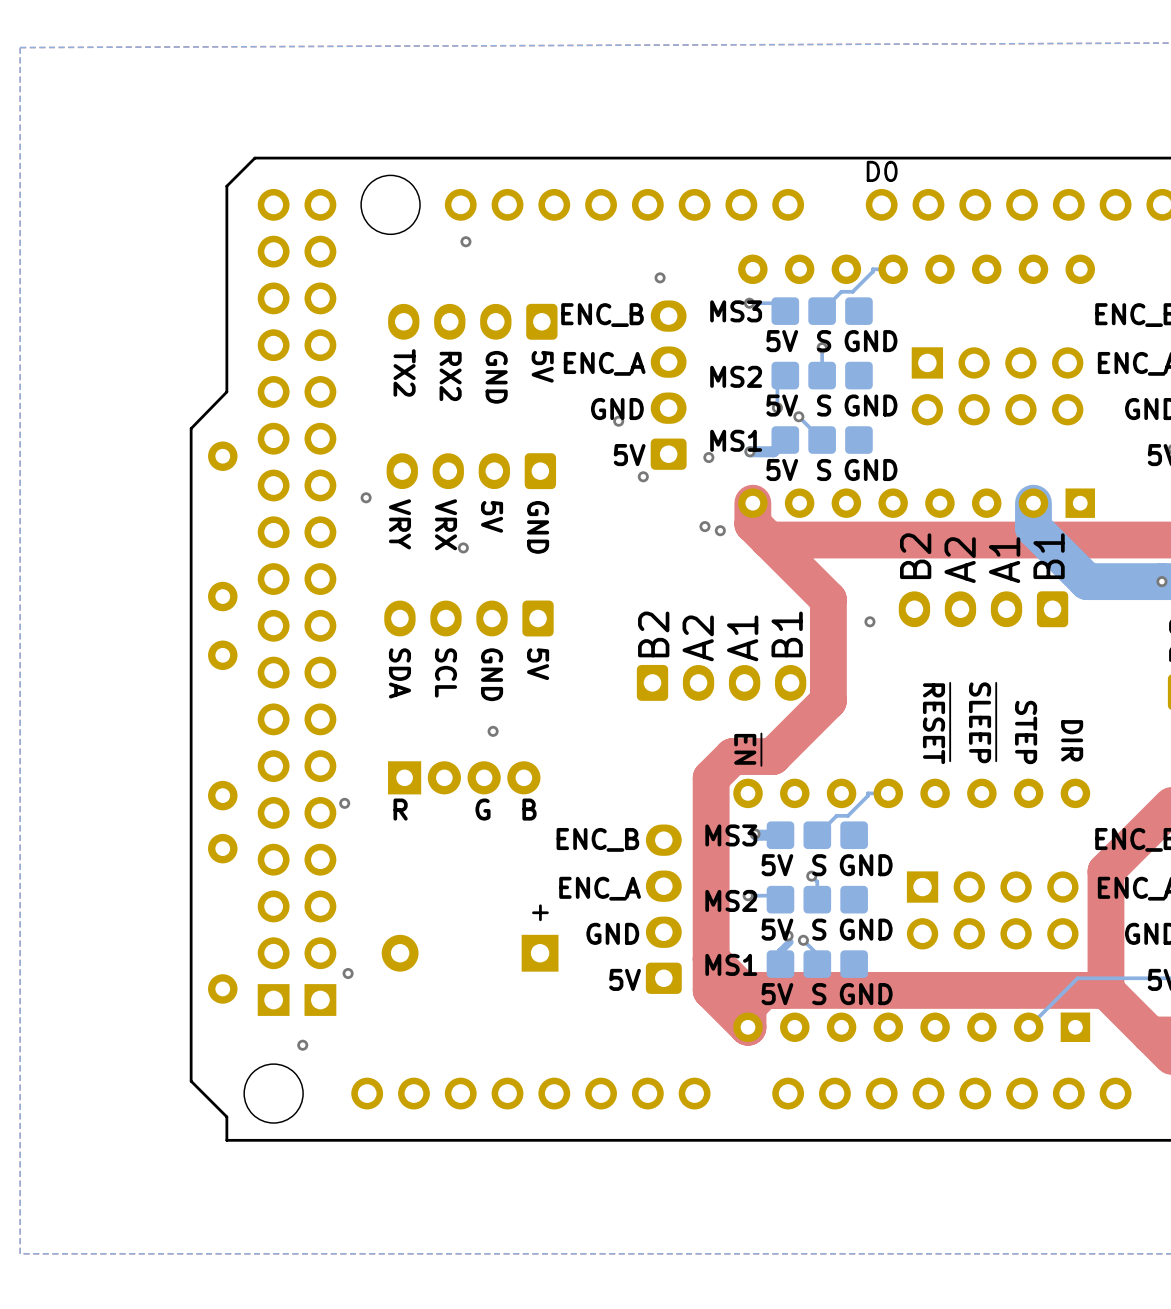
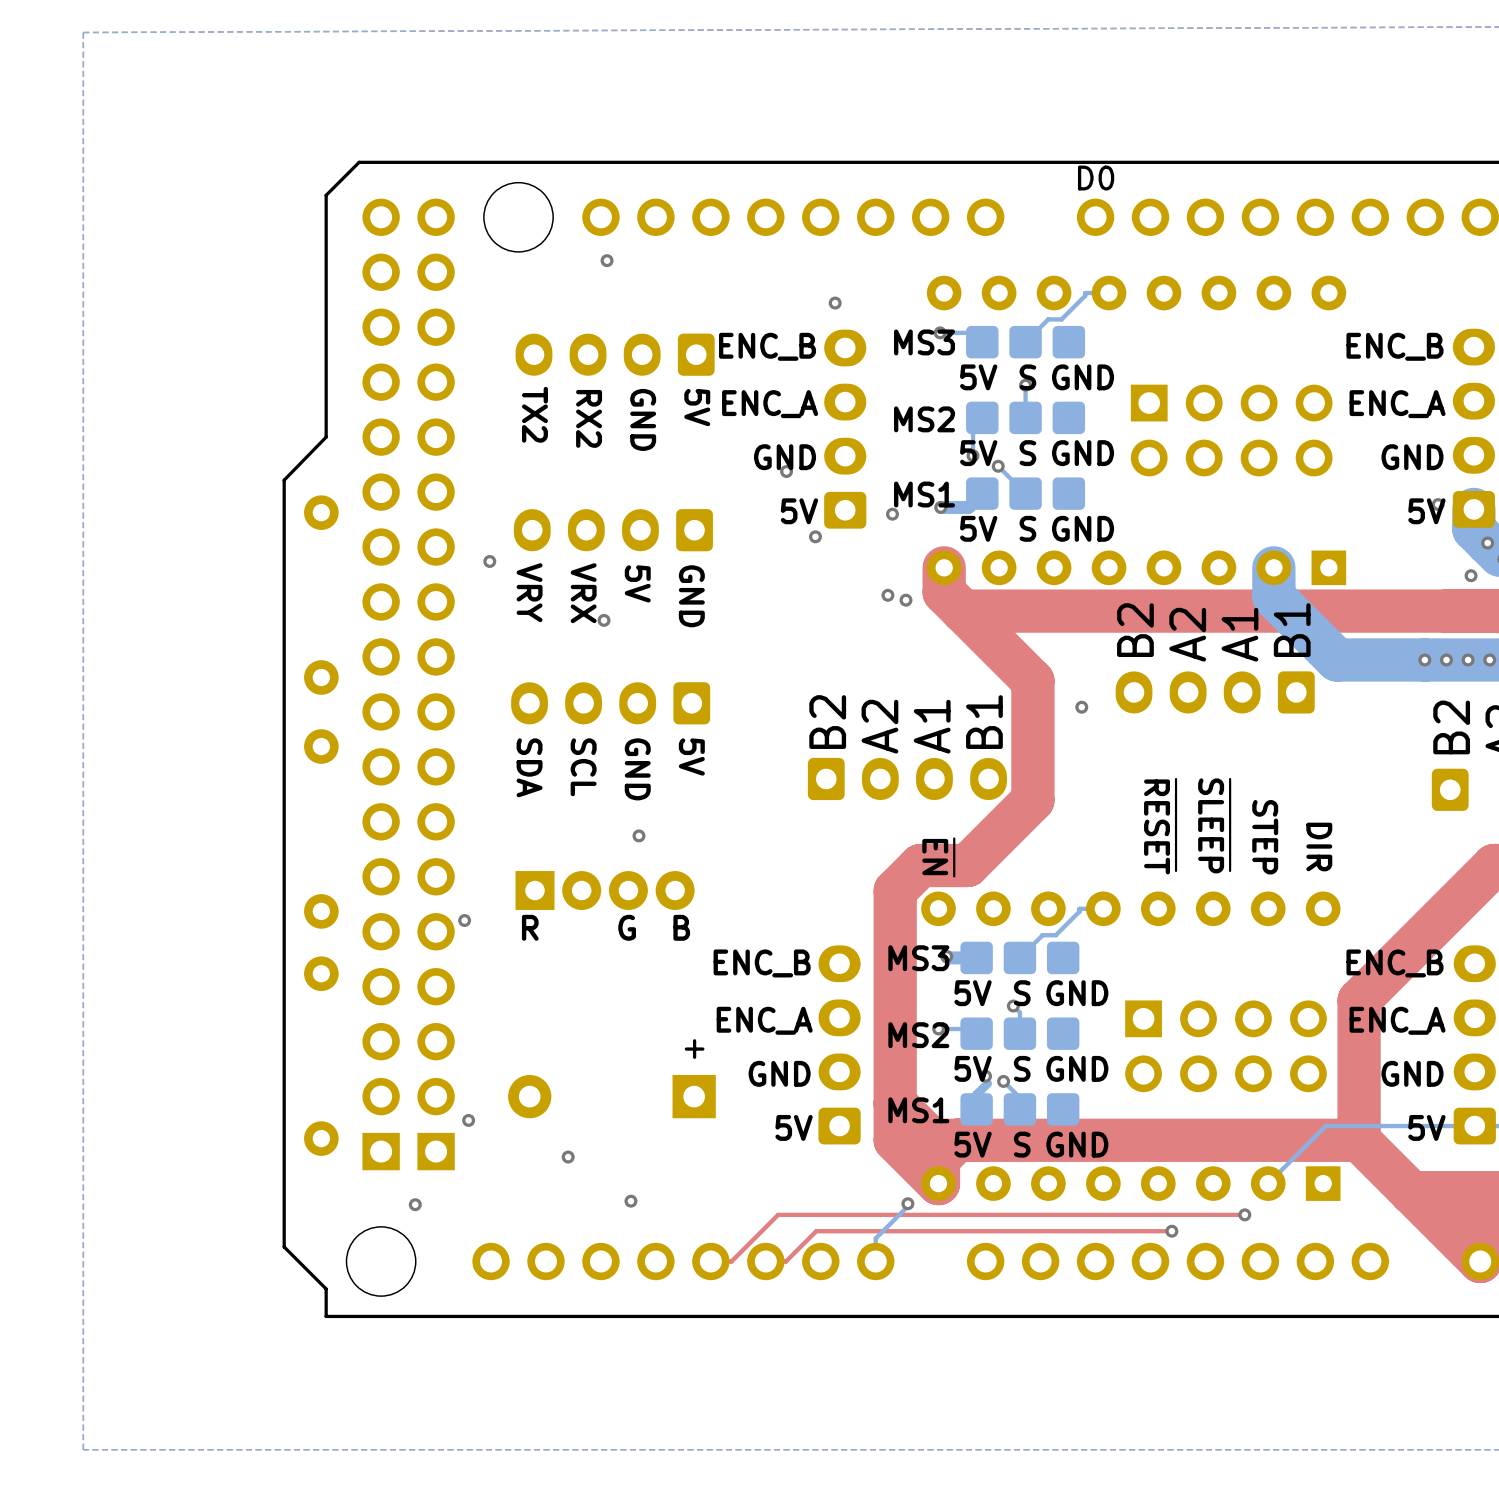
via: none -> (568, 1157)
via: none -> (630, 1201)
bottom track: none -> (907, 1203) (907, 1206) (875, 1238) (875, 1261)
via: none -> (907, 1203)
top track: none -> (1244, 1214) (778, 1214) (731, 1261) (710, 1261)
via: none -> (1244, 1214)
top track: none -> (1171, 1231) (816, 1231) (785, 1261) (765, 1261)
via: none -> (1171, 1231)

